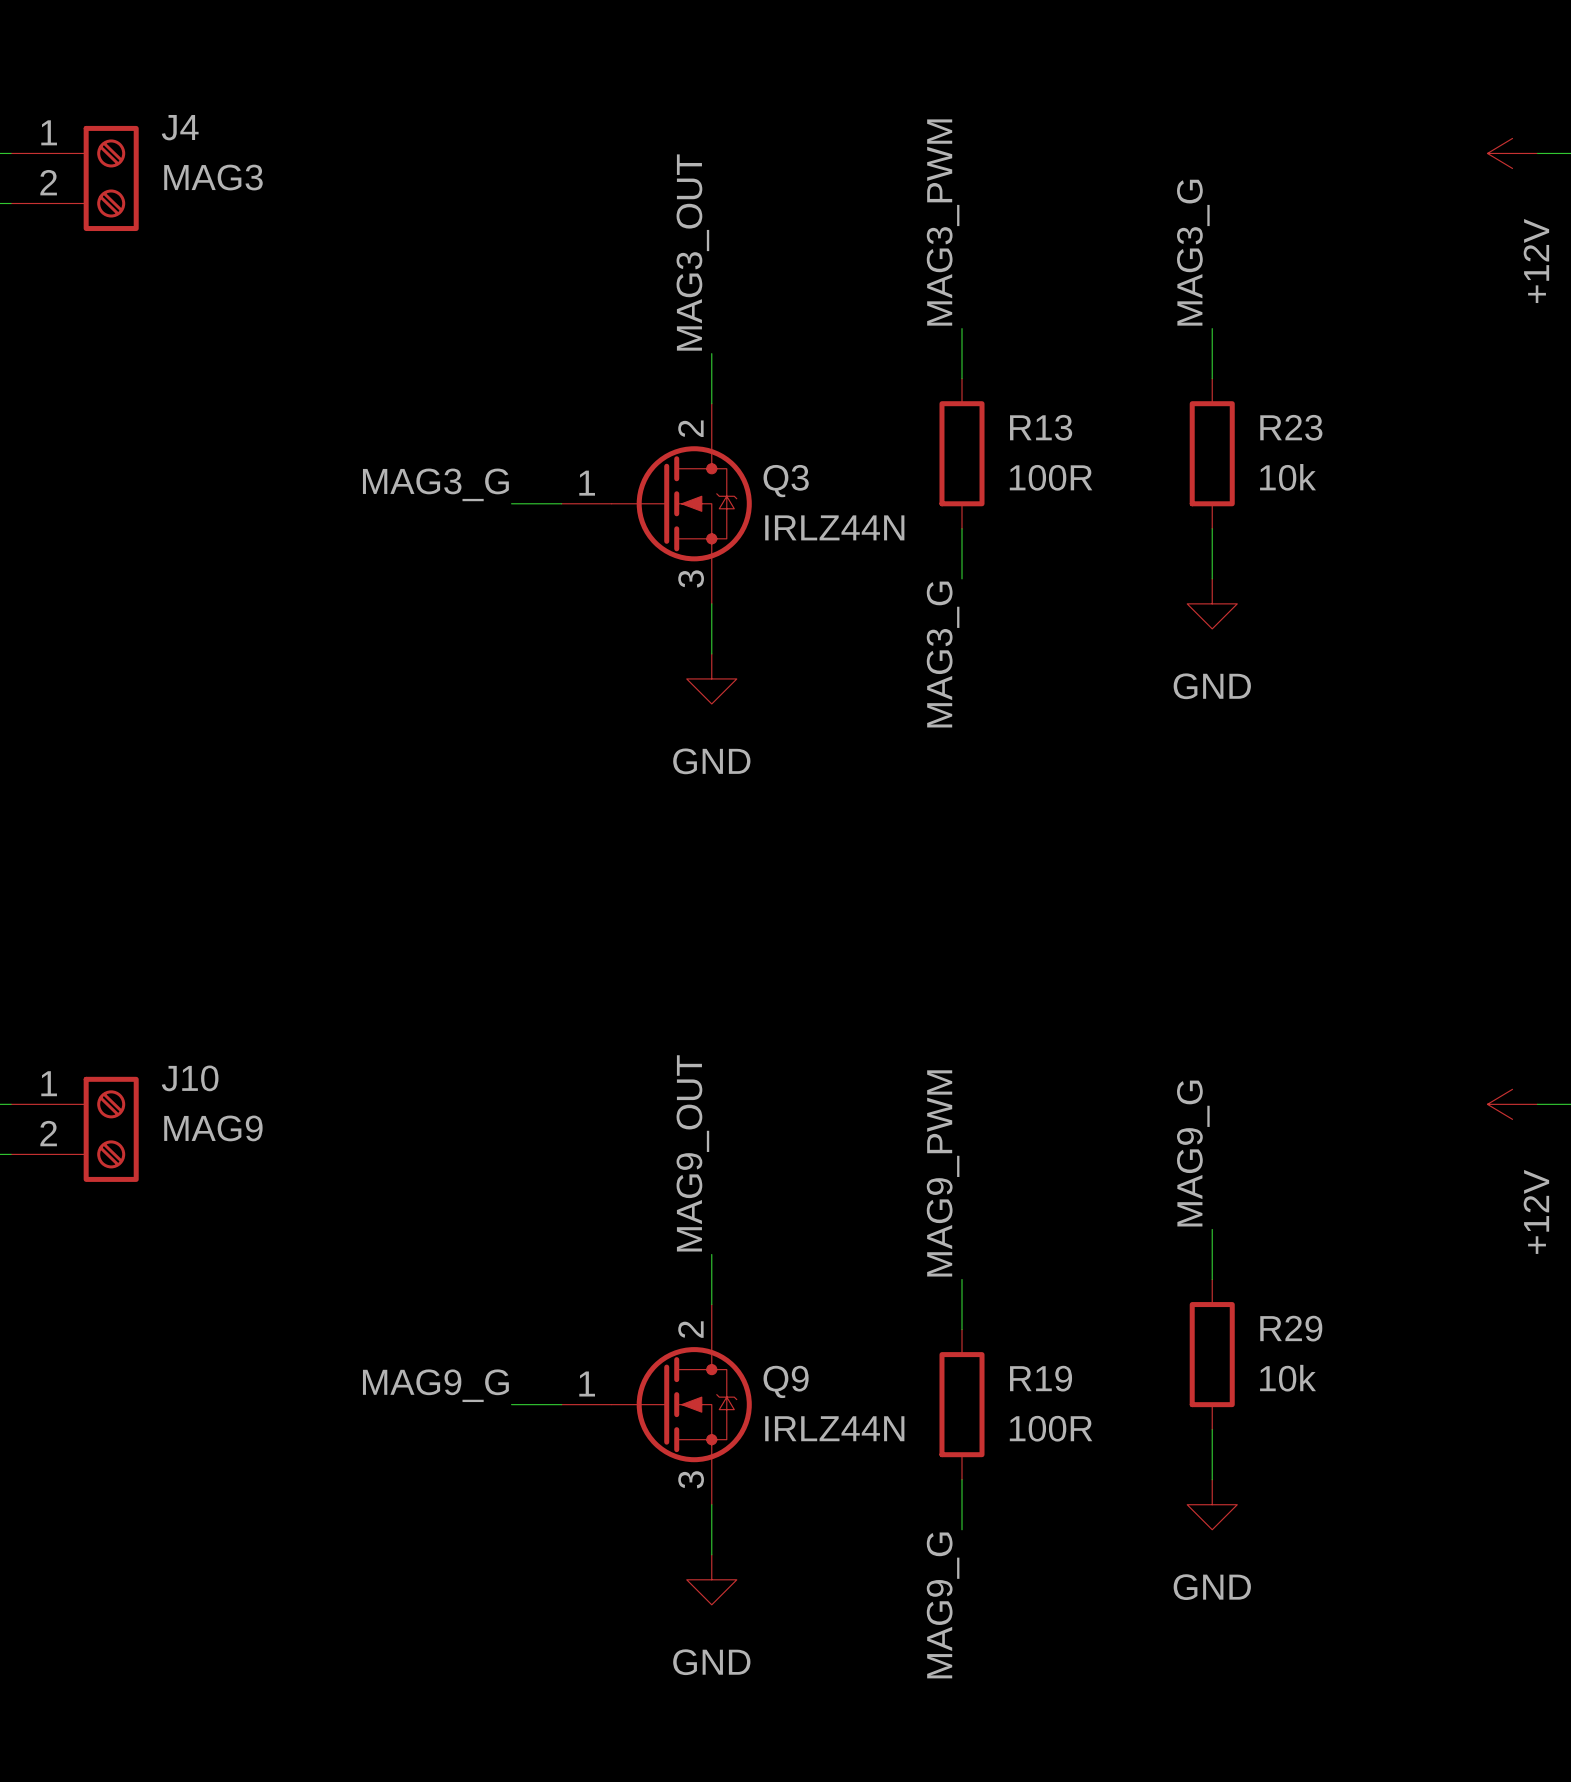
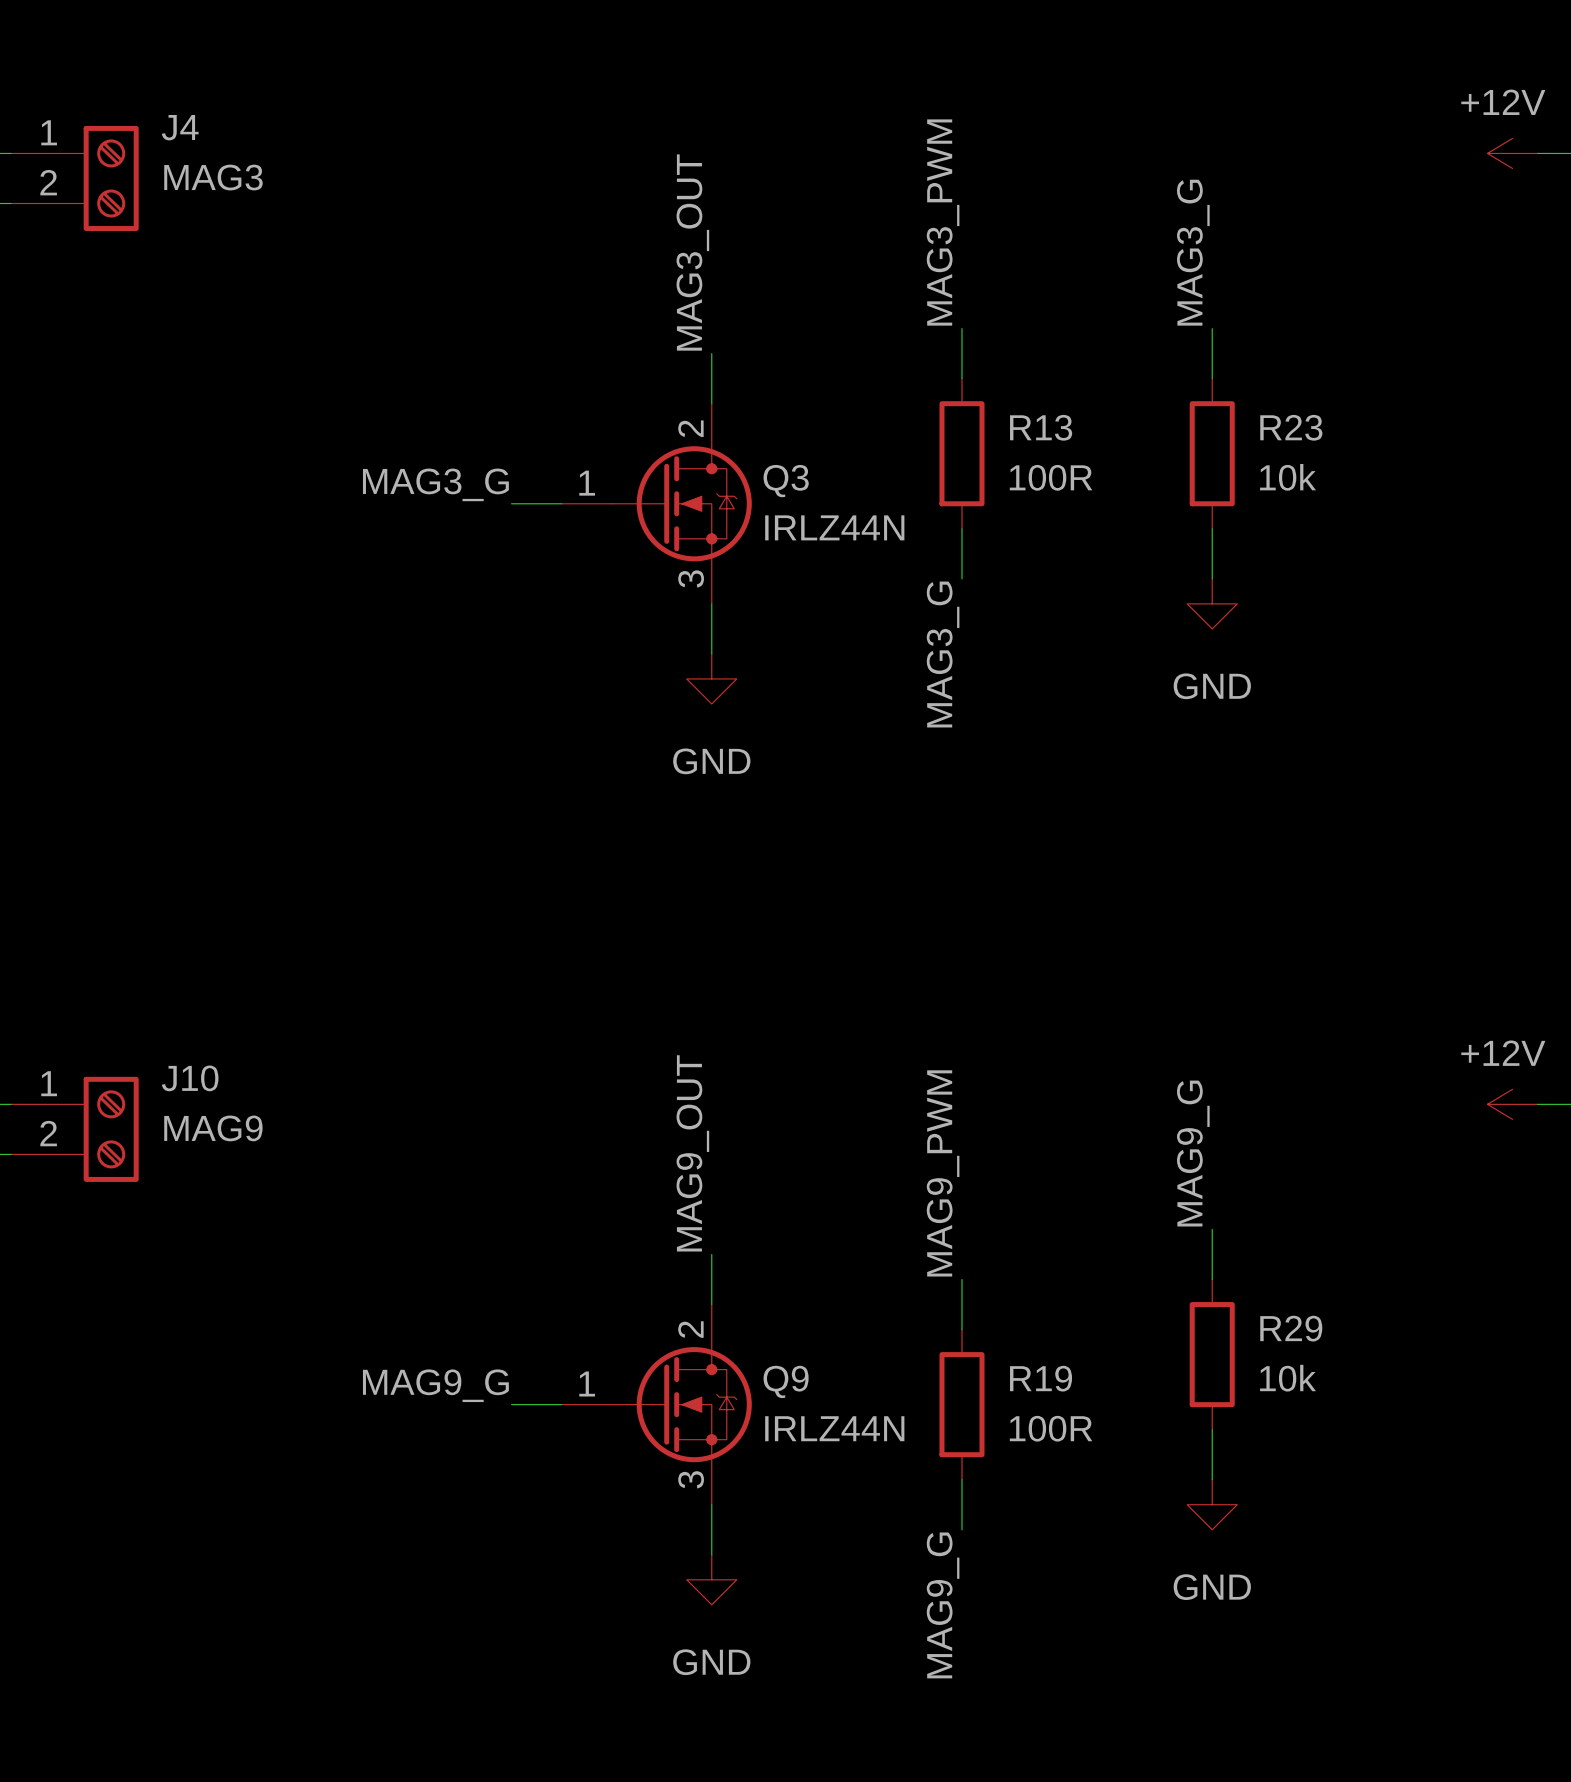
power symbol text rotation: 0° (1536, 261) -> 90° clockwise (1503, 102)
power symbol text position: +12V (1536, 261) -> +12V (1503, 102)
power symbol text rotation: 0° (1536, 1211) -> 90° clockwise (1503, 1053)
power symbol text position: +12V (1536, 1211) -> +12V (1503, 1053)

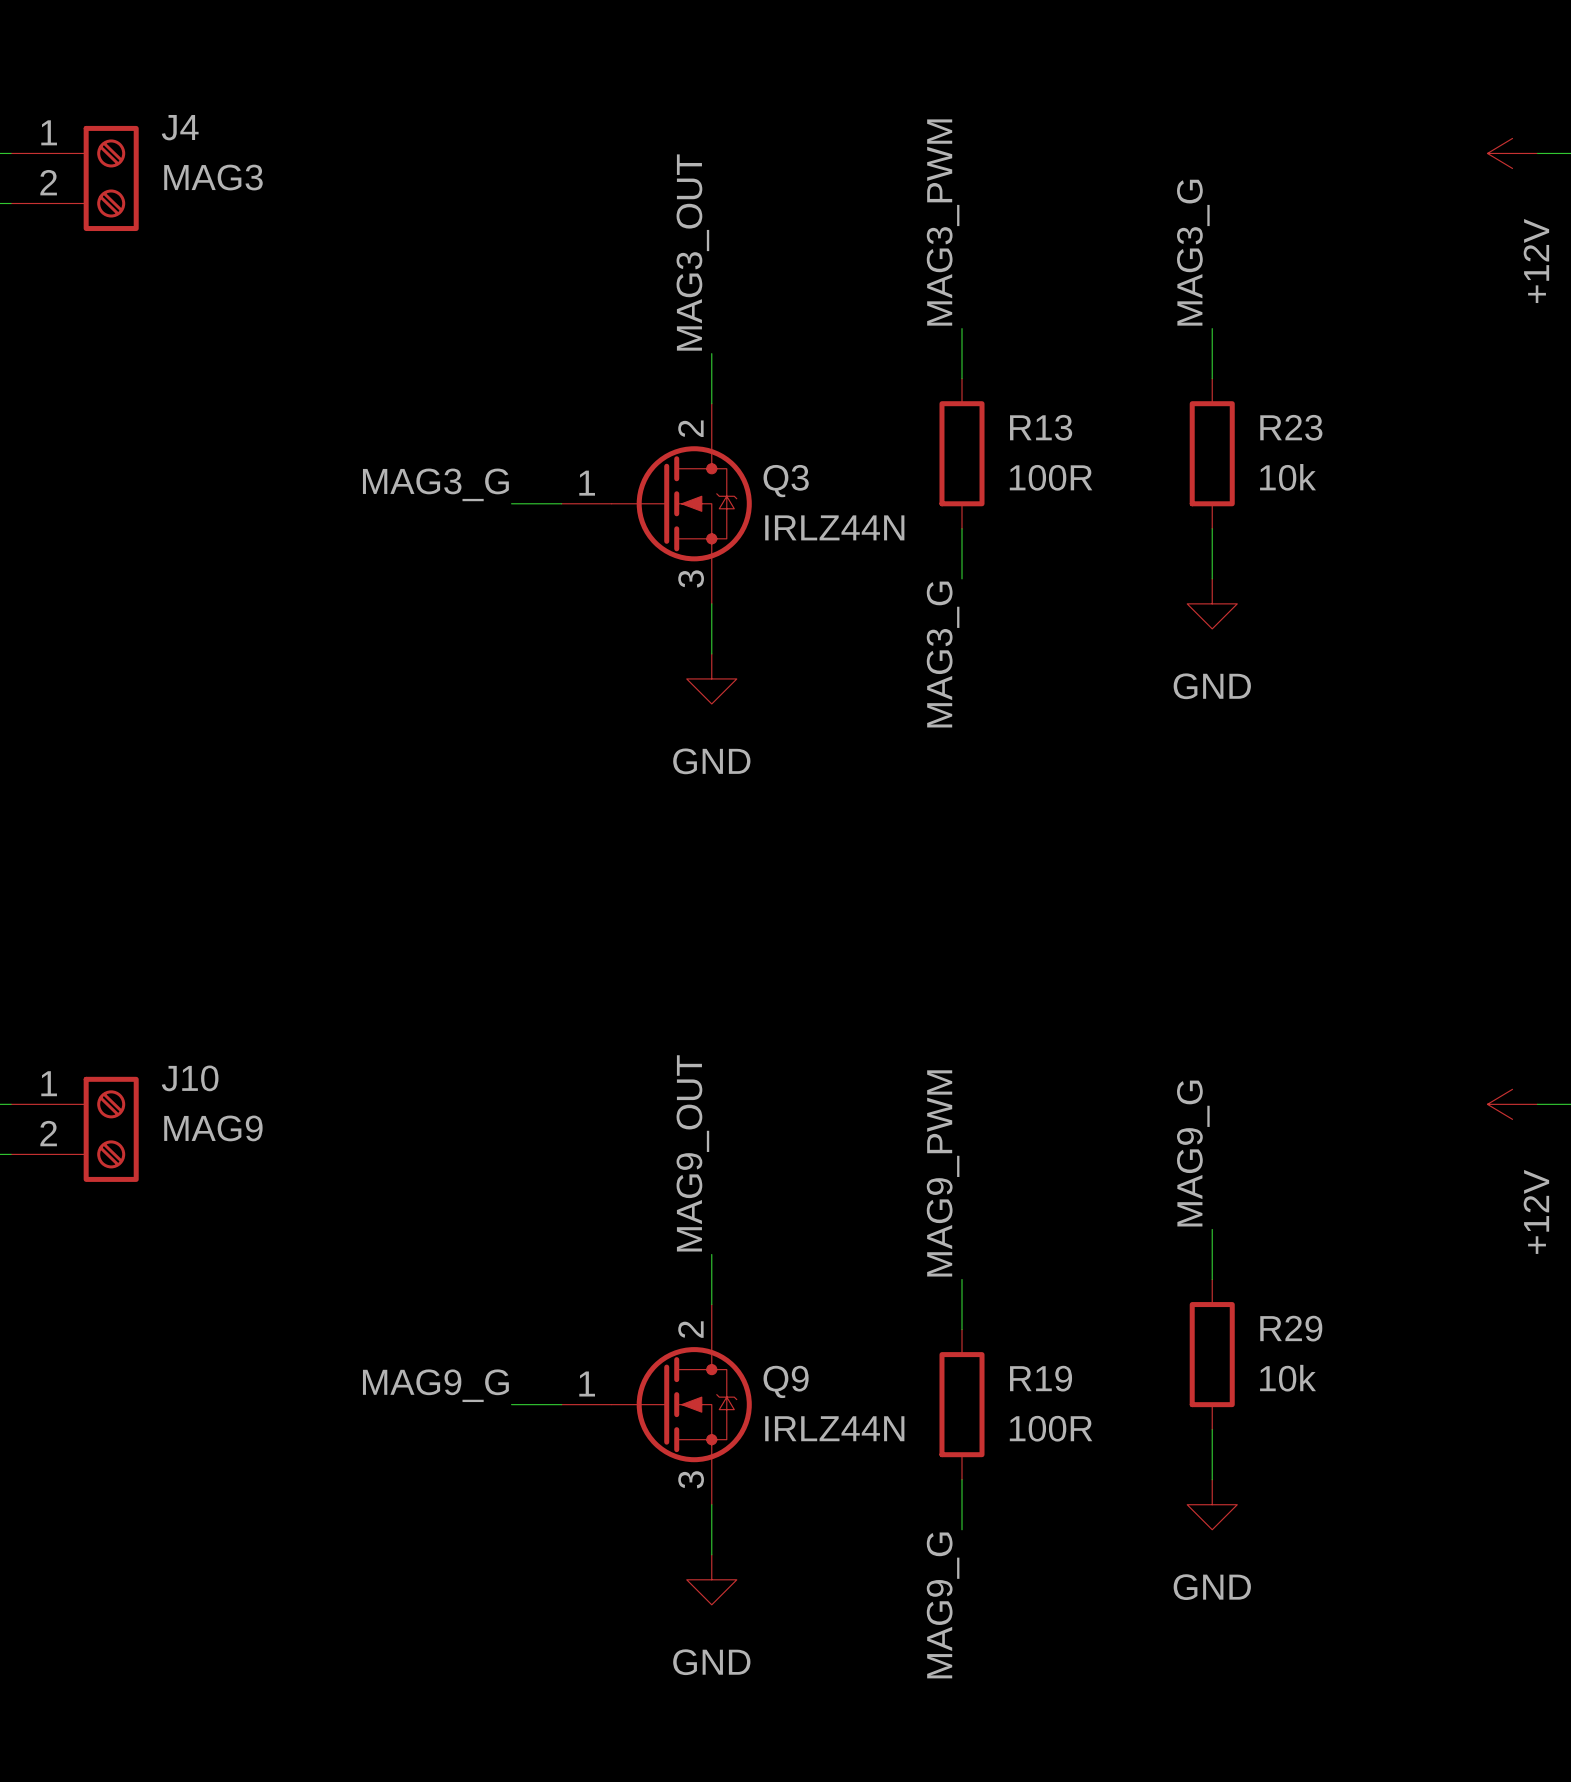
power symbol text rotation: 0° (1503, 102) -> 90° counterclockwise (1536, 261)
power symbol text position: +12V (1503, 102) -> +12V (1536, 261)
power symbol text rotation: 0° (1503, 1053) -> 90° counterclockwise (1536, 1211)
power symbol text position: +12V (1503, 1053) -> +12V (1536, 1211)

